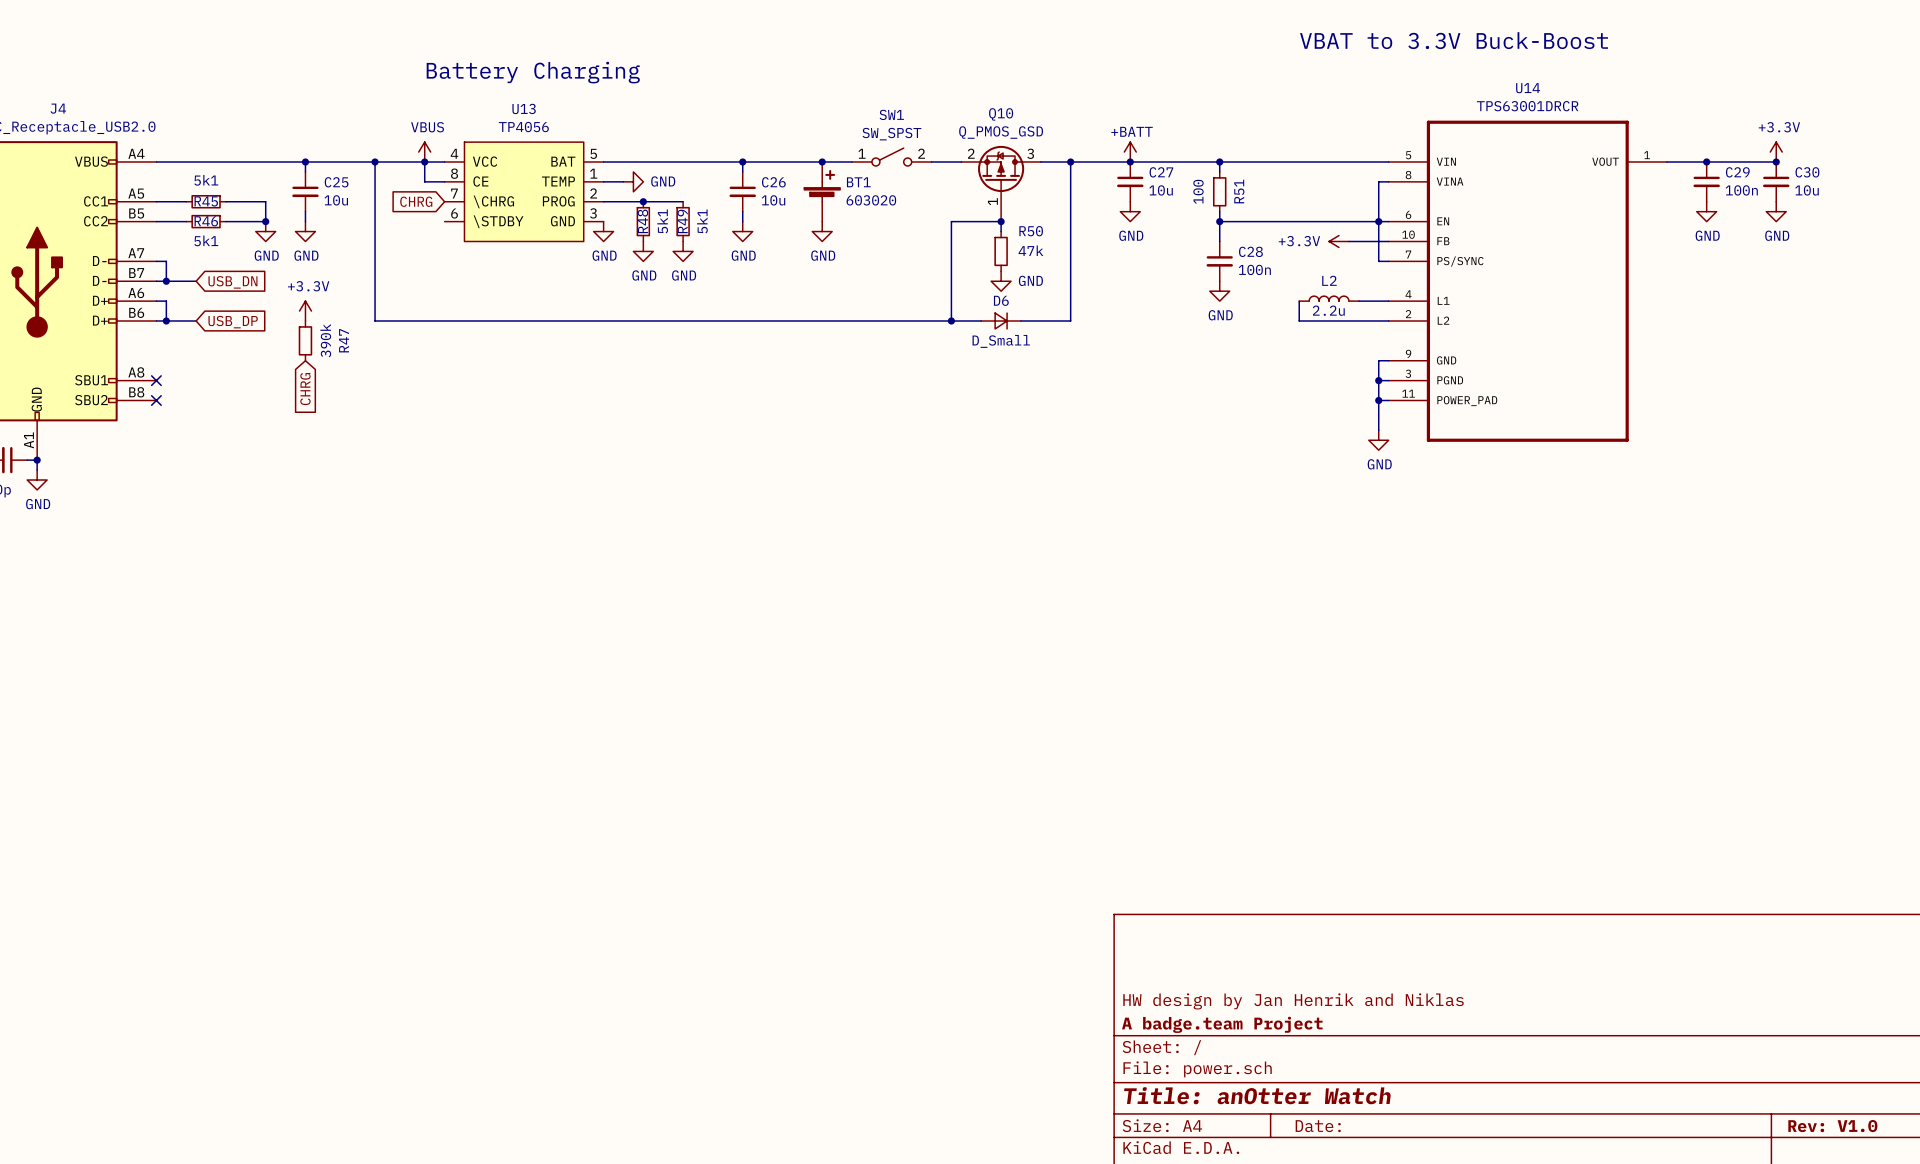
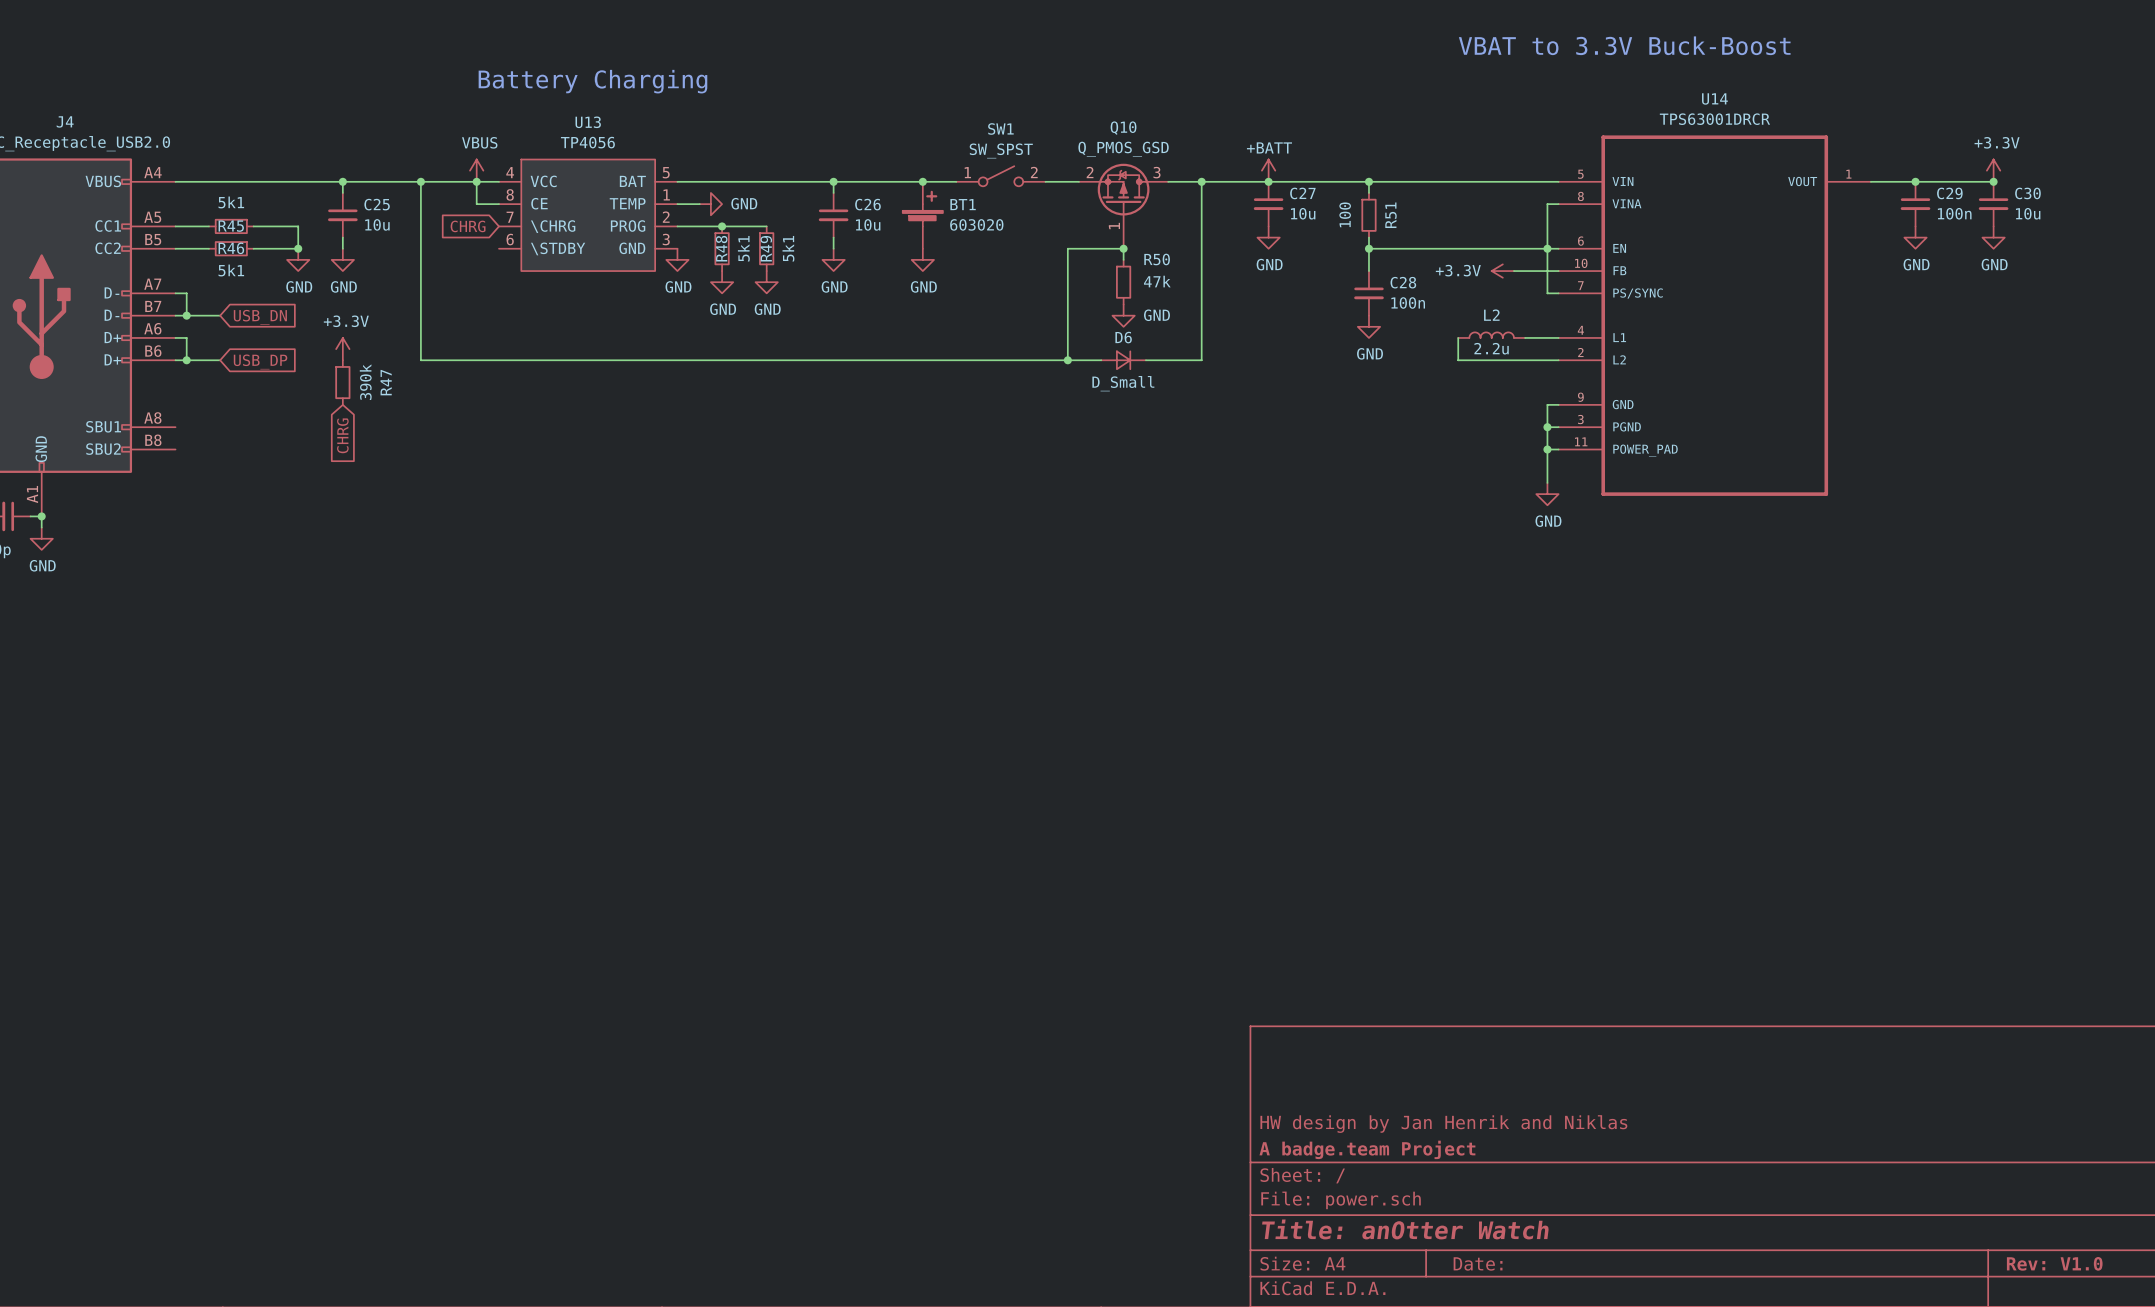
no-connect mark: (156, 380) -> none
no-connect mark: (156, 400) -> none

